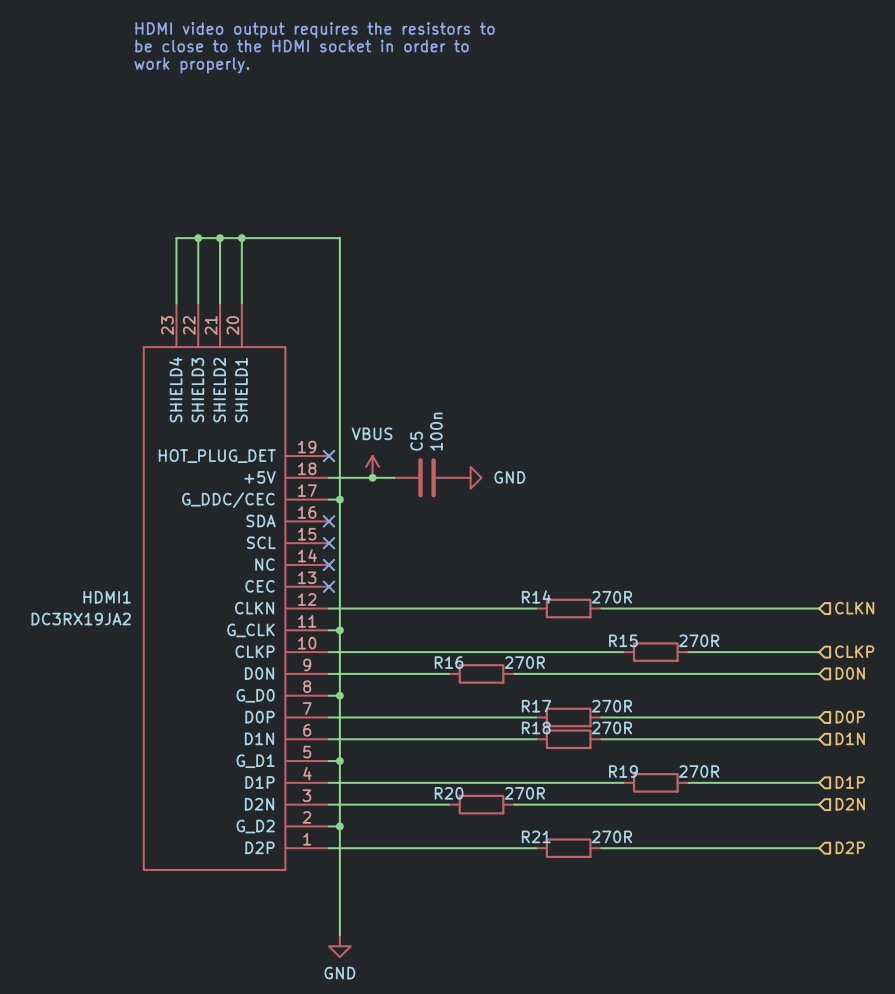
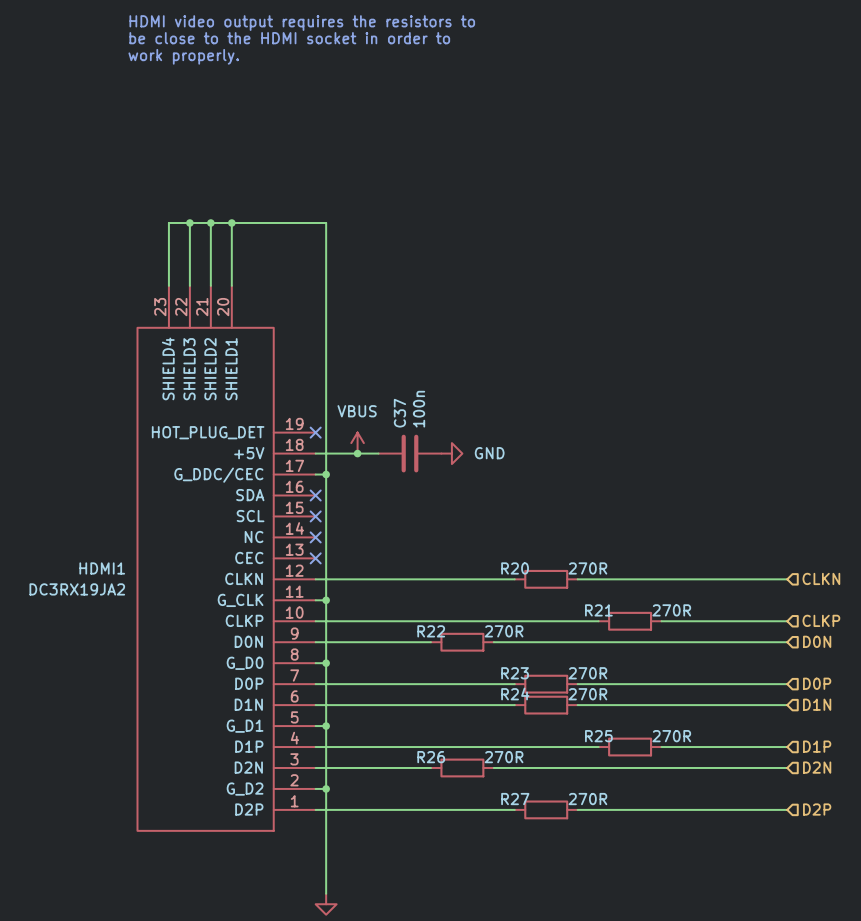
C5 name: C5 (416, 441) -> C37 (399, 413)
R14 name: R14 (536, 596) -> R20 (515, 568)
R15 name: R15 (623, 640) -> R21 (598, 610)
R16 name: R16 (449, 662) -> R22 (431, 631)
R17 name: R17 (536, 706) -> R23 (515, 673)
R18 name: R18 (536, 727) -> R24 (515, 693)
R19 name: R19 (623, 771) -> R25 (598, 736)
R20 name: R20 (449, 793) -> R26 (431, 757)
R21 name: R21 (536, 836) -> R27 (515, 799)

